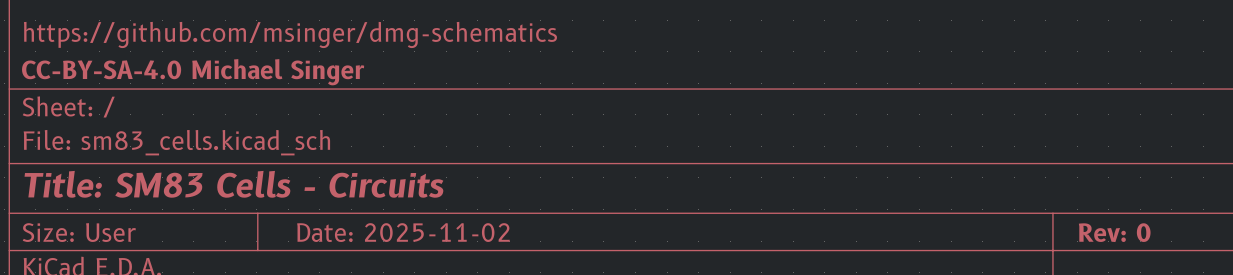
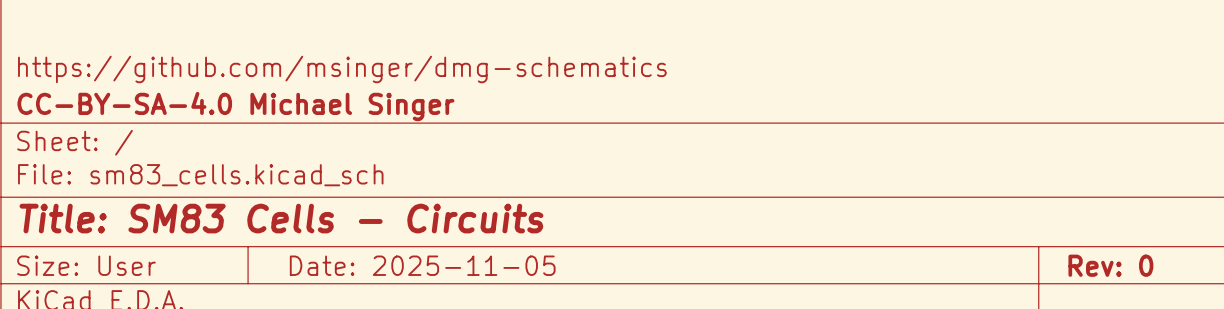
title block: Date: 2025-11-02 (403, 232) -> Date: 2025-11-05 (422, 265)

